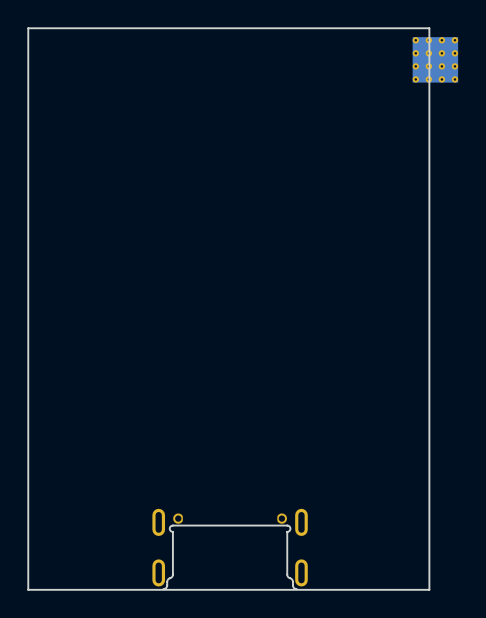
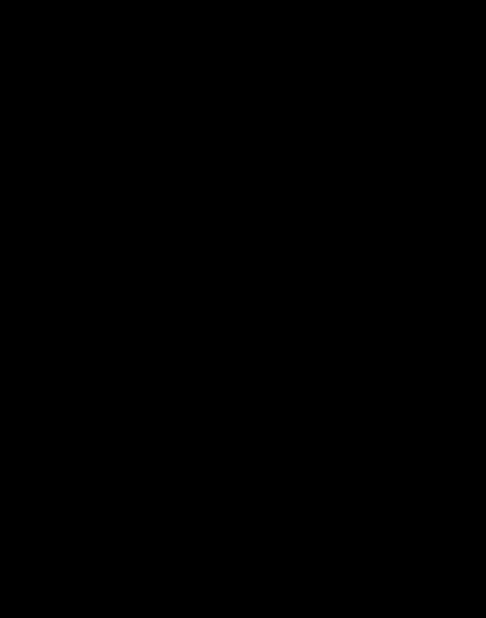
board edge: (429, 28) (28, 28) (28, 589) (429, 589) (429, 28) -> none
part: (435, 59) -> none
part: (230, 549) -> none

